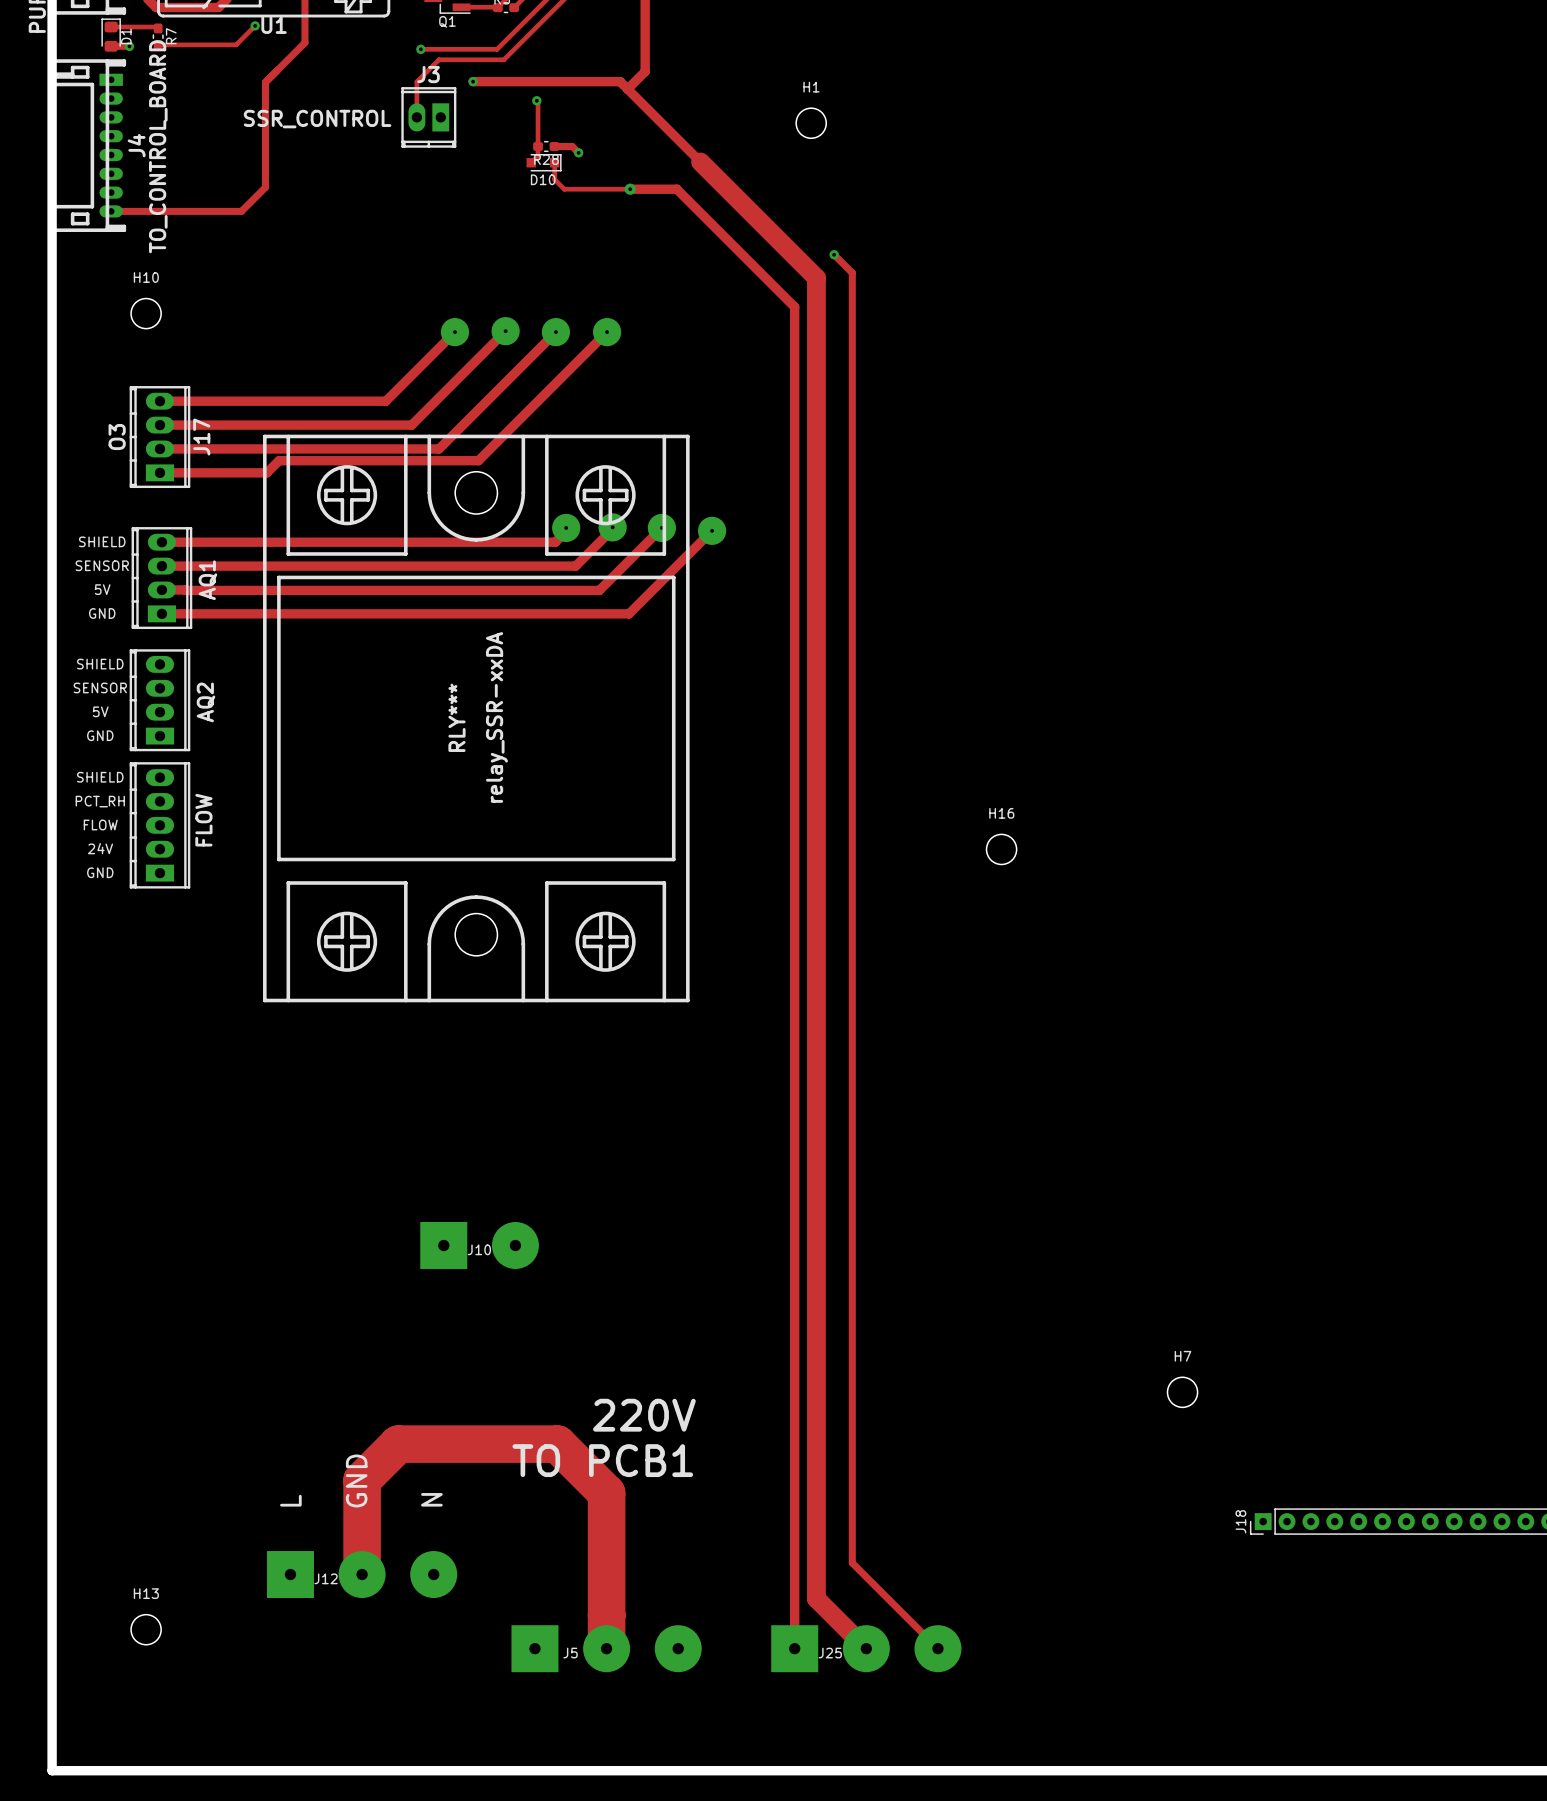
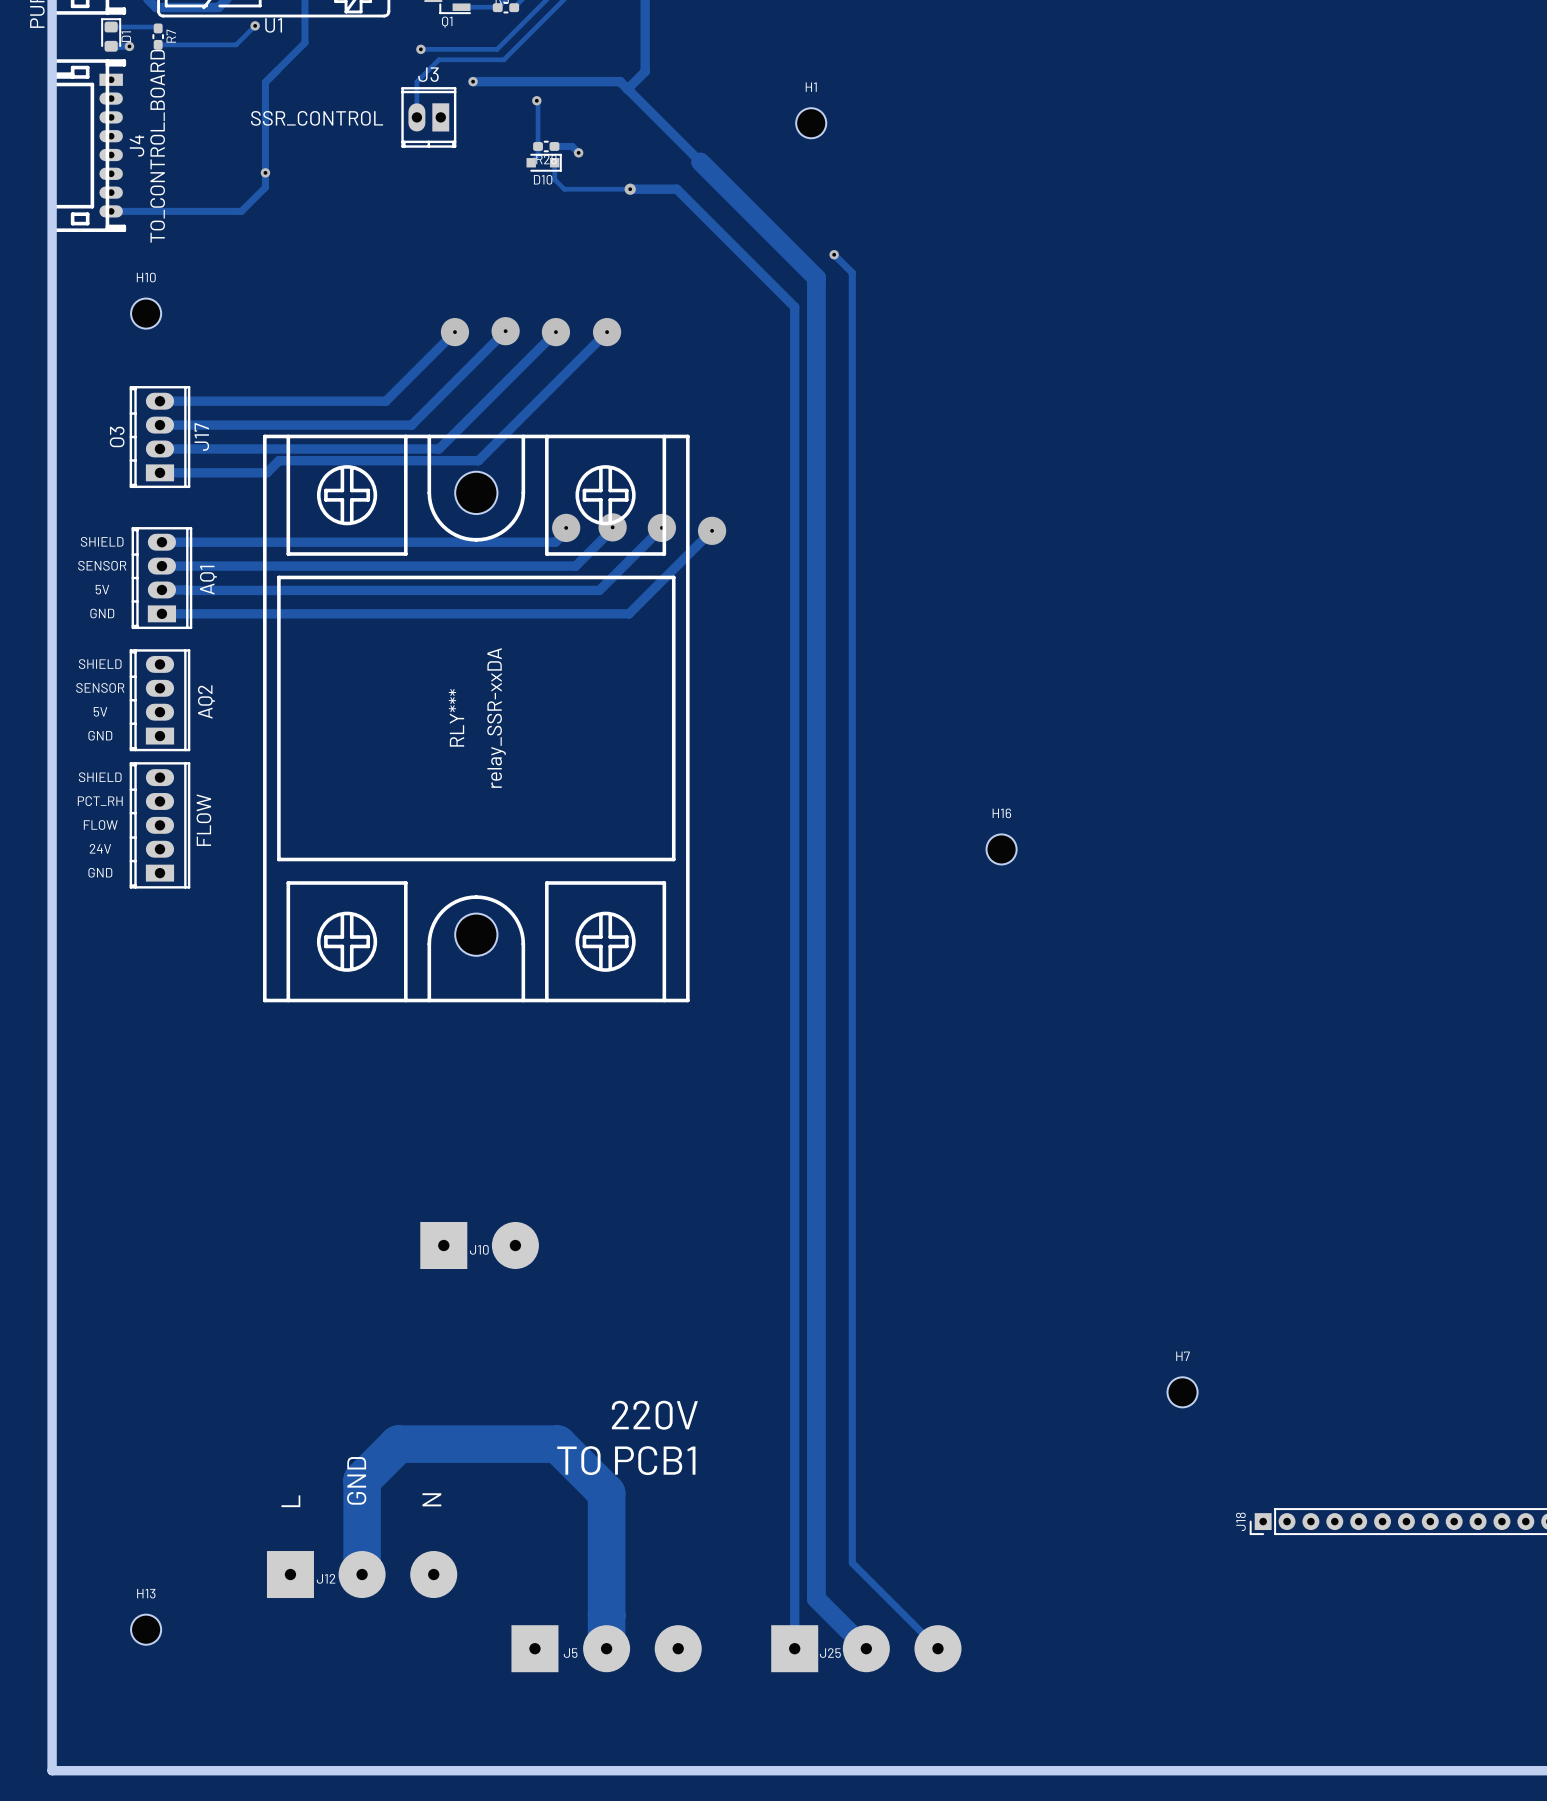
via: none -> (265, 172)

